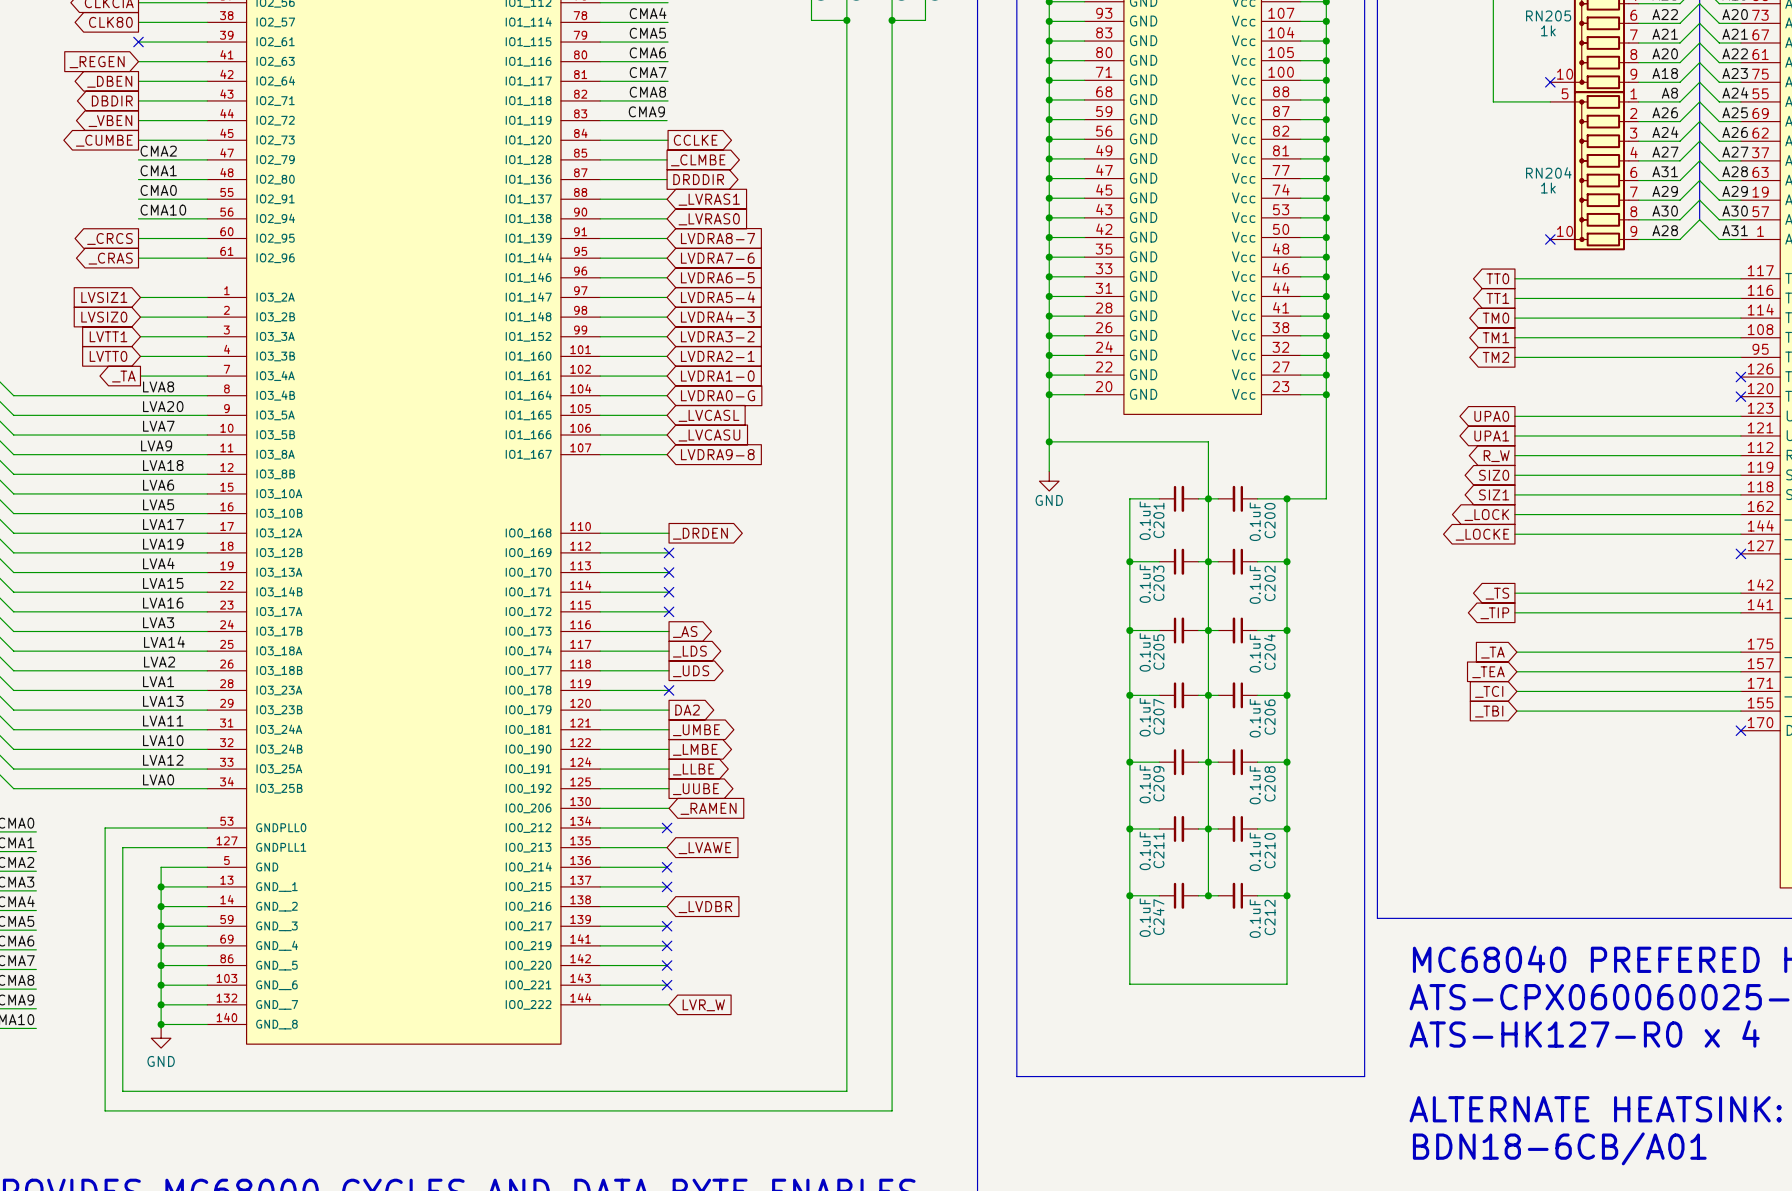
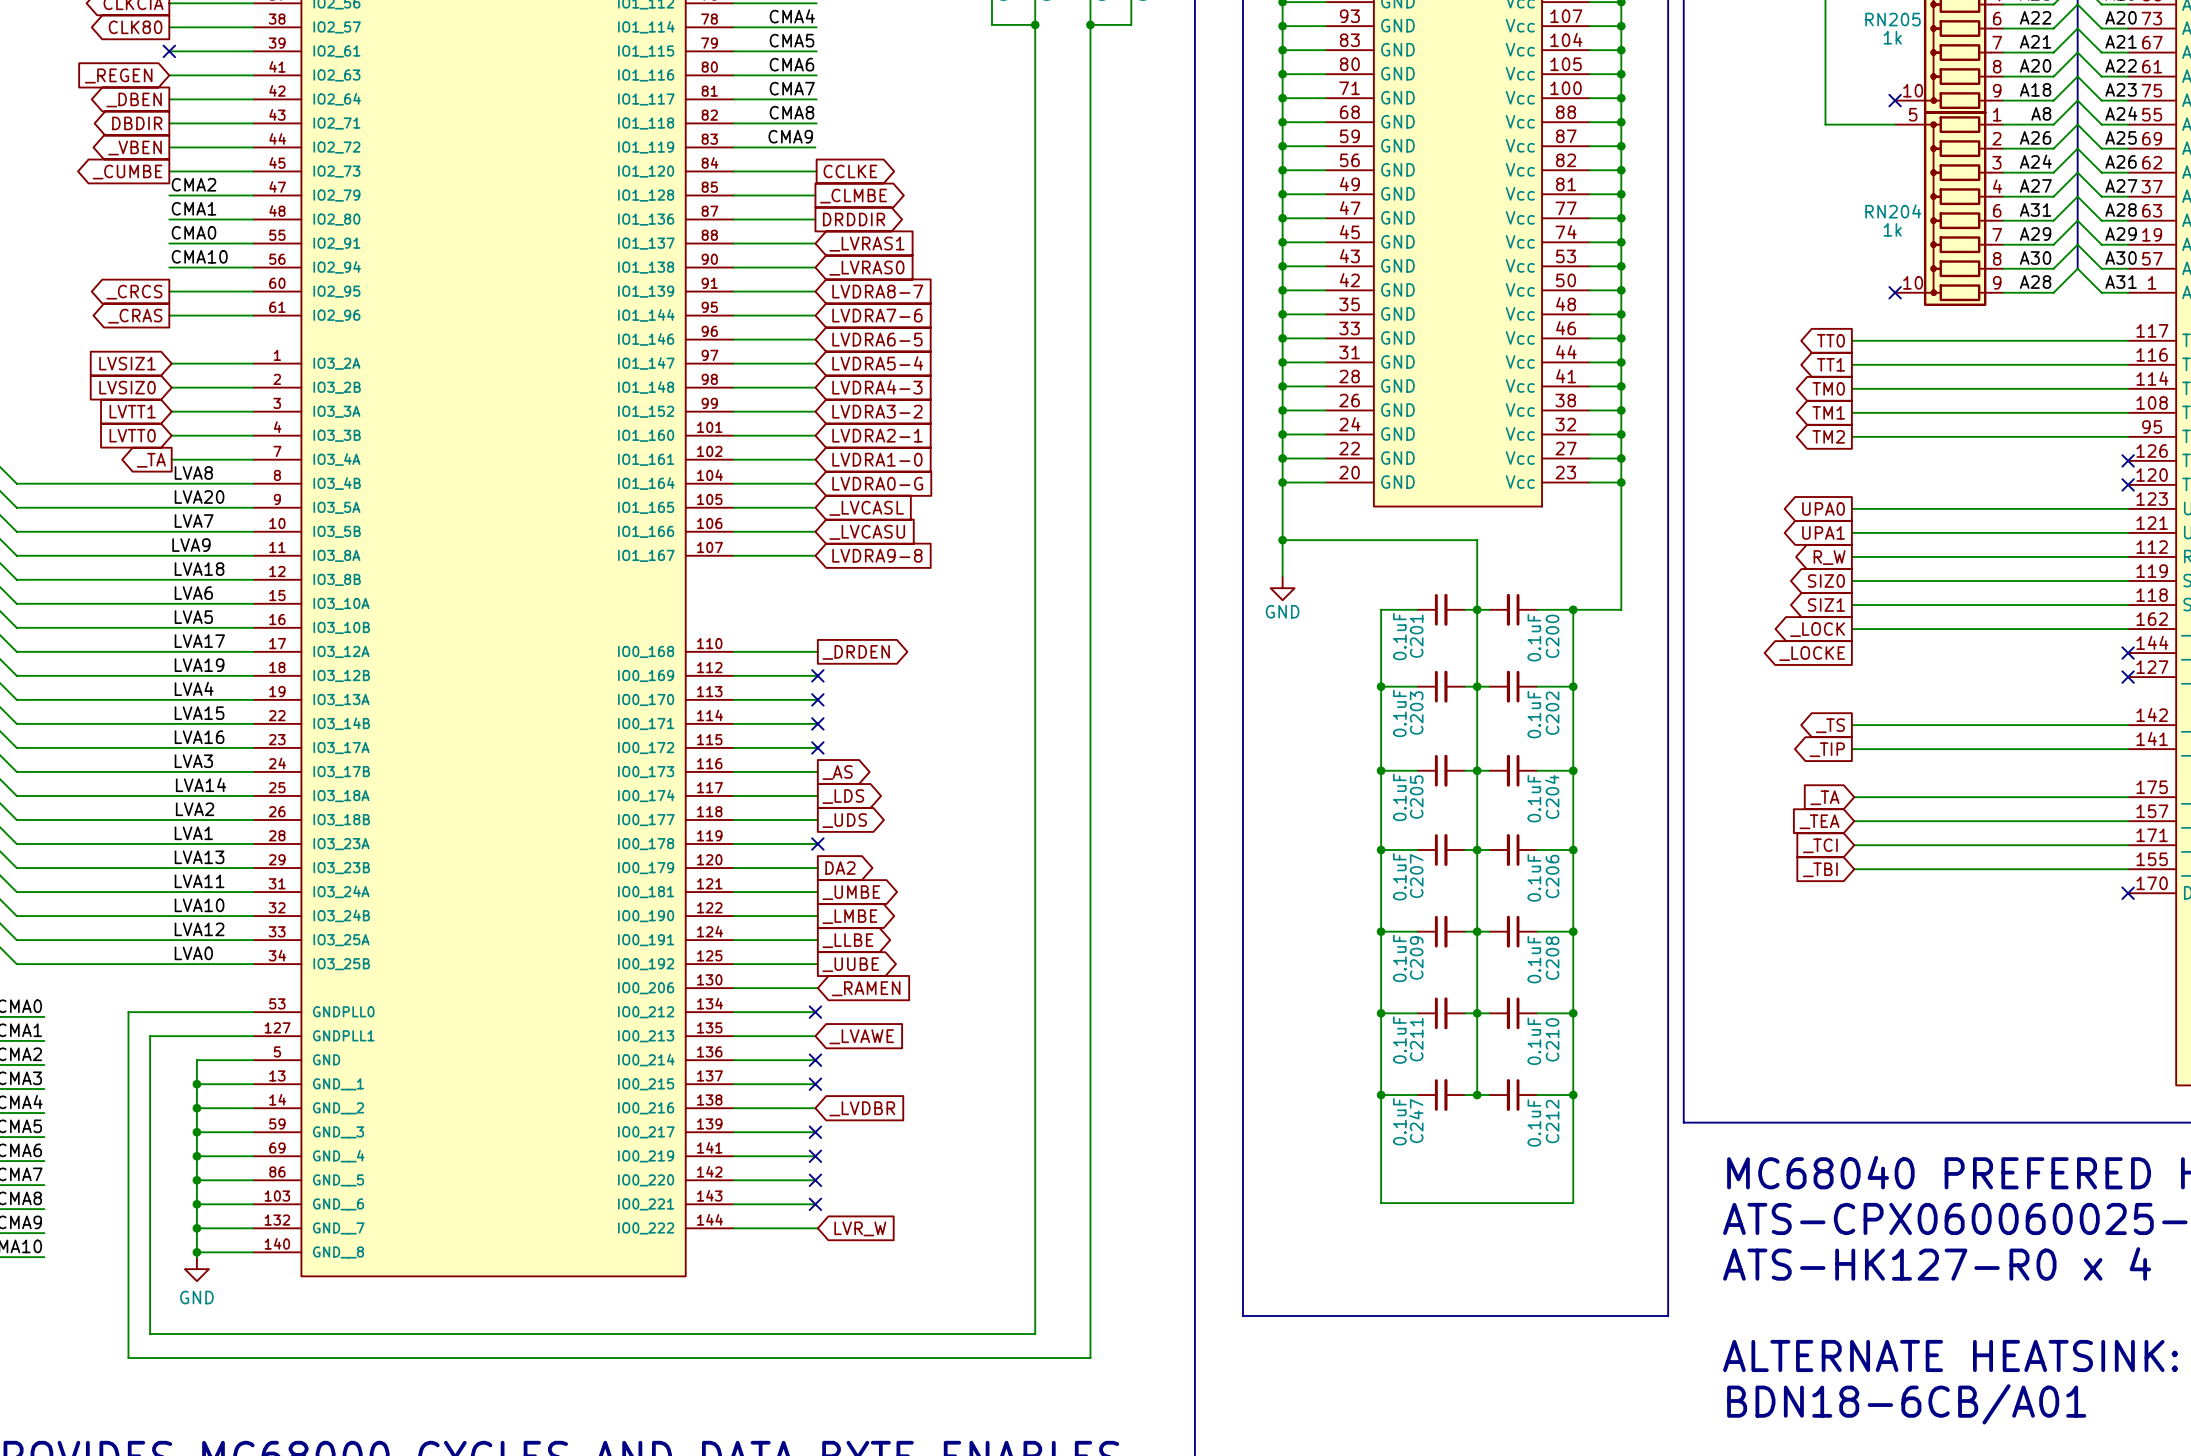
wire: (1514, 534) (1740, 534) -> none
no-connect mark: none -> (2128, 653)

